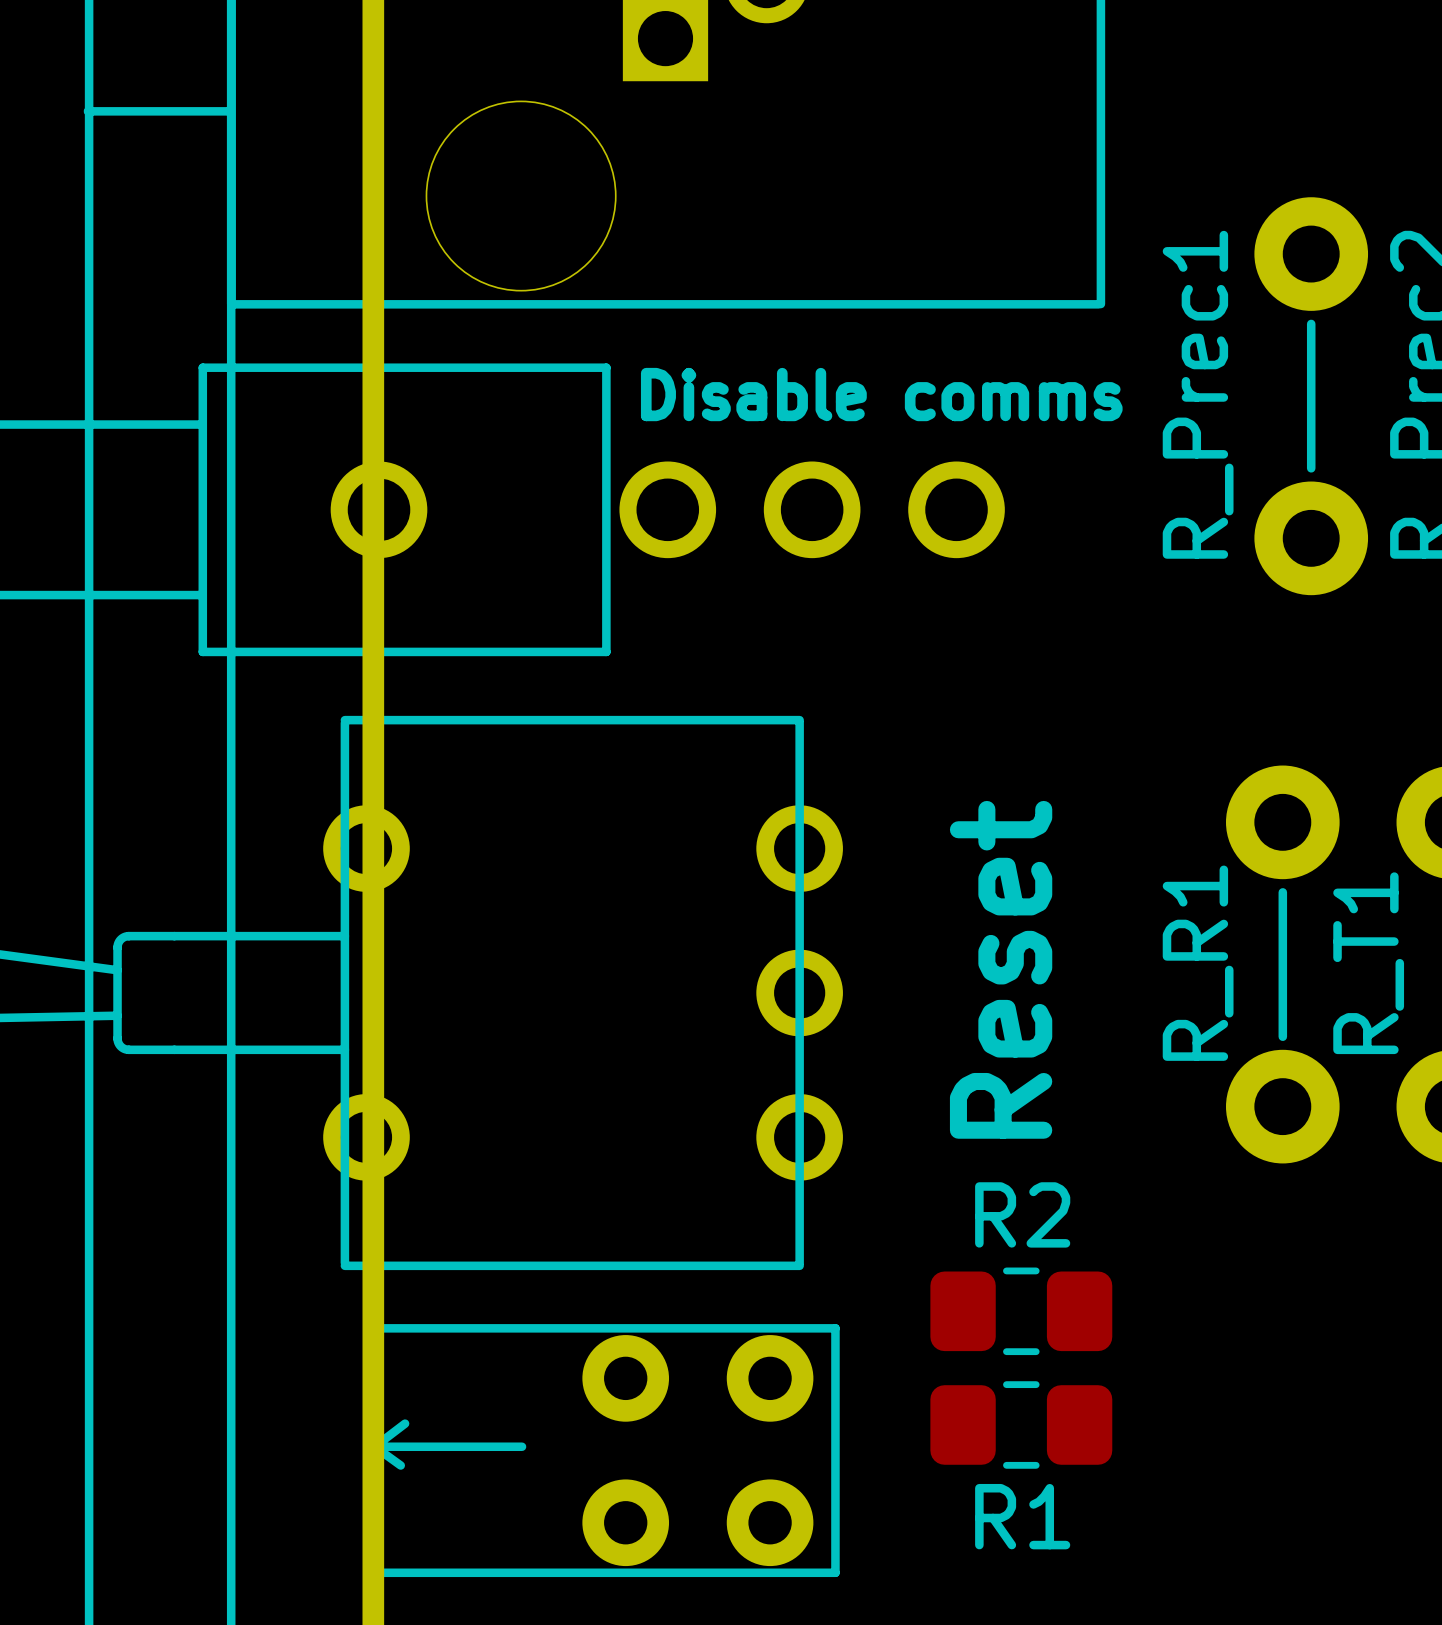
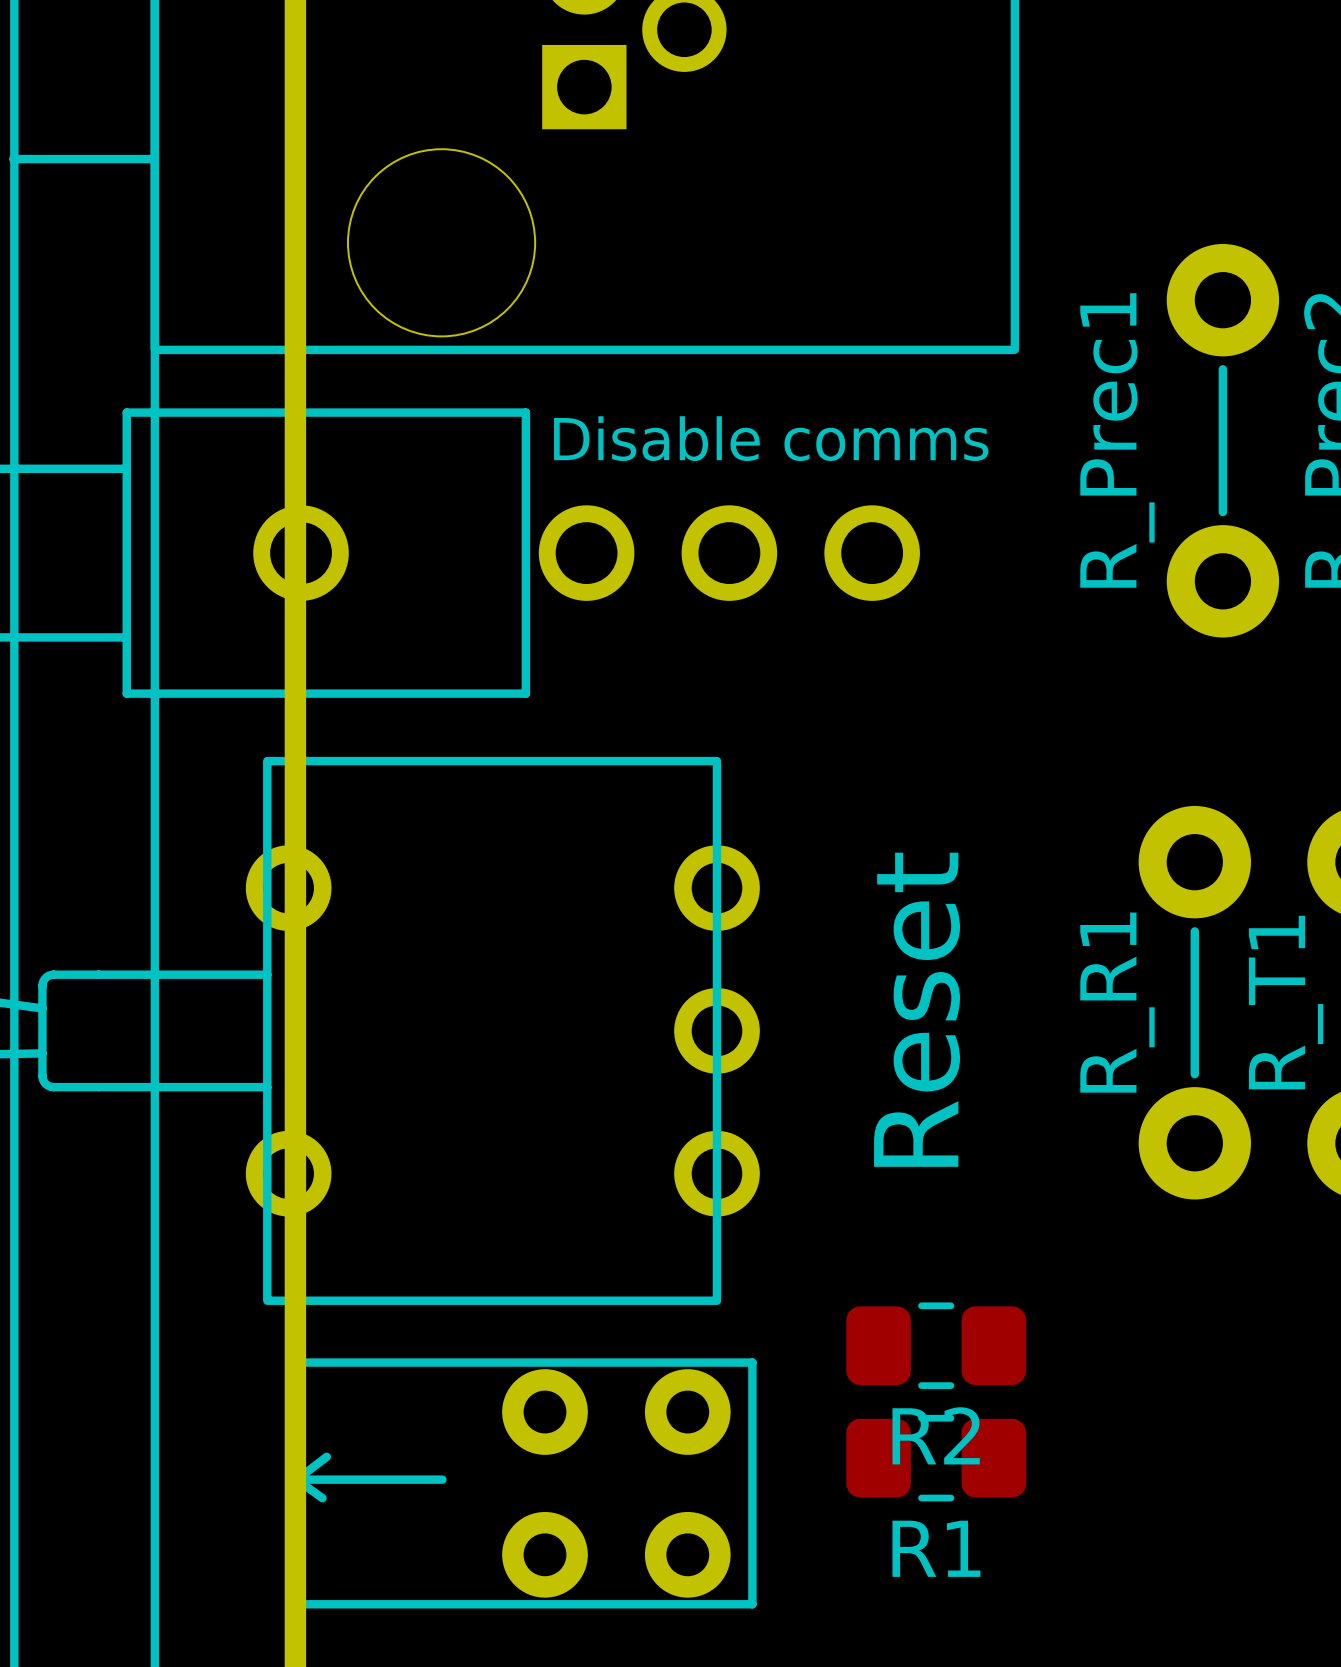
R2 name position: R2 (1022, 1214) -> R2 (936, 1435)

